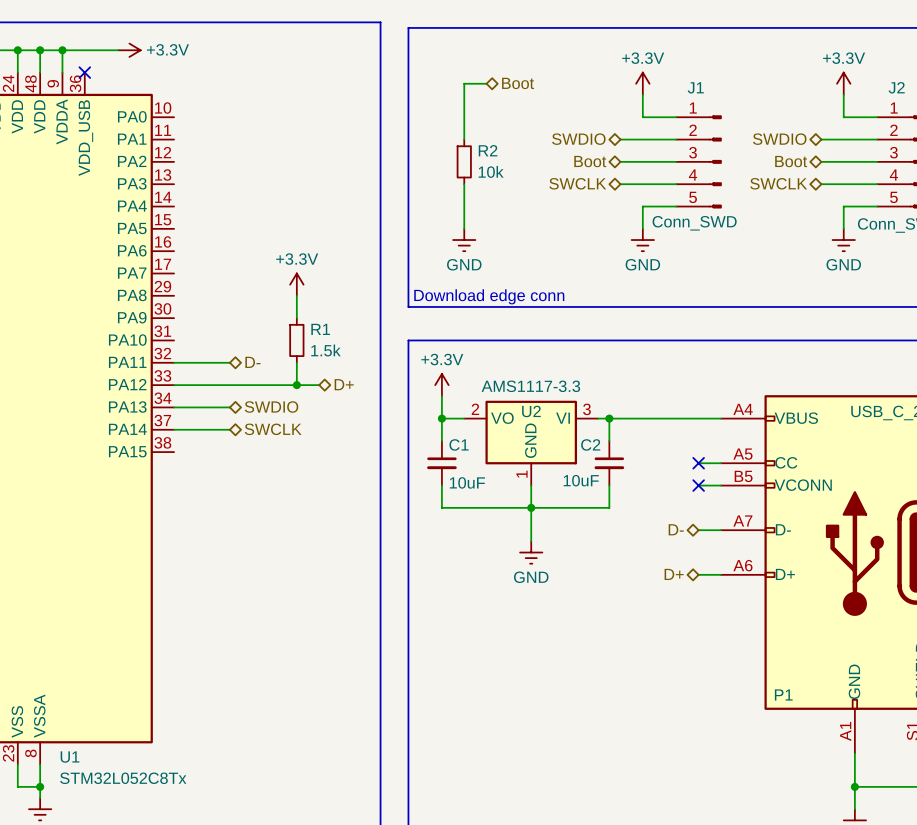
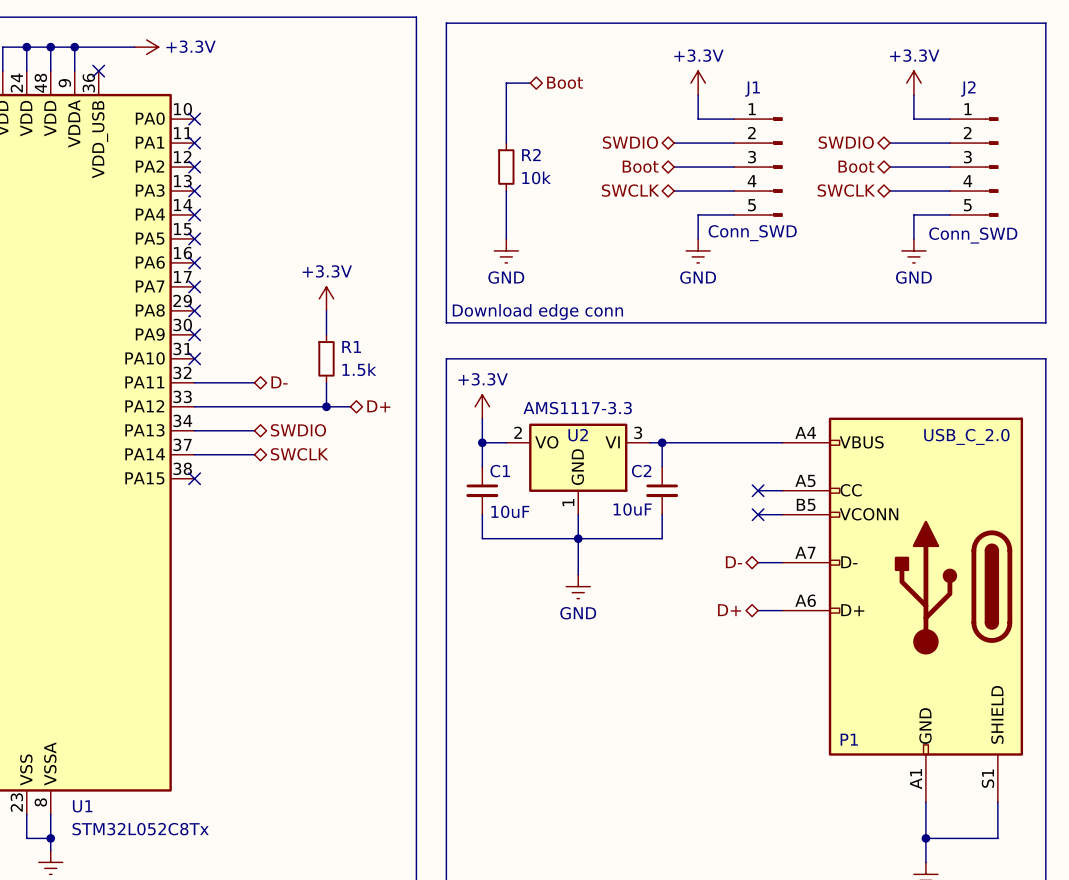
no-connect mark: none -> (194, 119)
no-connect mark: none -> (194, 143)
no-connect mark: none -> (194, 167)
no-connect mark: none -> (194, 191)
no-connect mark: none -> (194, 214)
no-connect mark: none -> (194, 238)
no-connect mark: none -> (194, 262)
no-connect mark: none -> (194, 286)
no-connect mark: none -> (194, 310)
no-connect mark: none -> (194, 334)
no-connect mark: none -> (194, 358)
no-connect mark: none -> (194, 478)

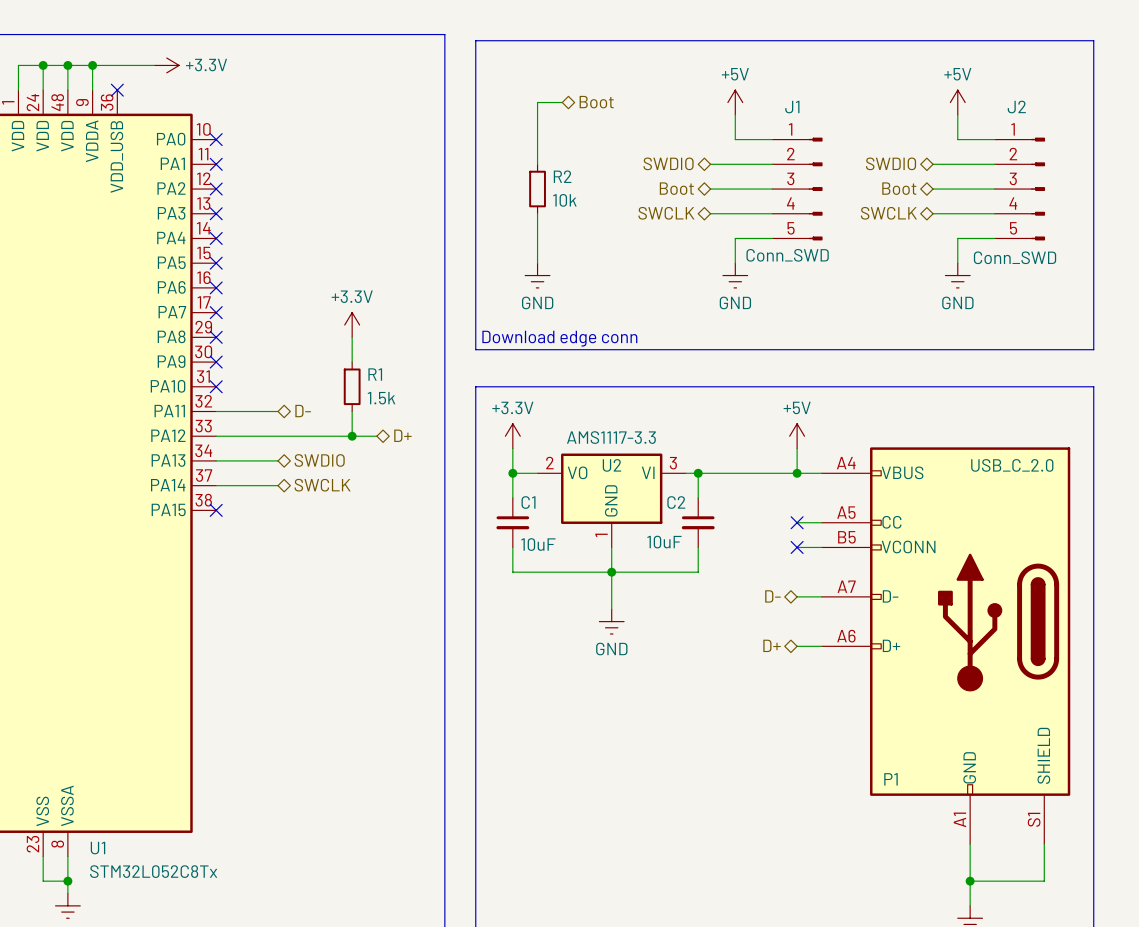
power symbol: +3.3V (698, 83) -> +5V (735, 102)
power symbol: +3.3V (913, 83) -> +5V (957, 102)
power symbol: none -> +5V (797, 436)
wire: none -> (797, 448) (797, 473)
junction: none -> (797, 473)

